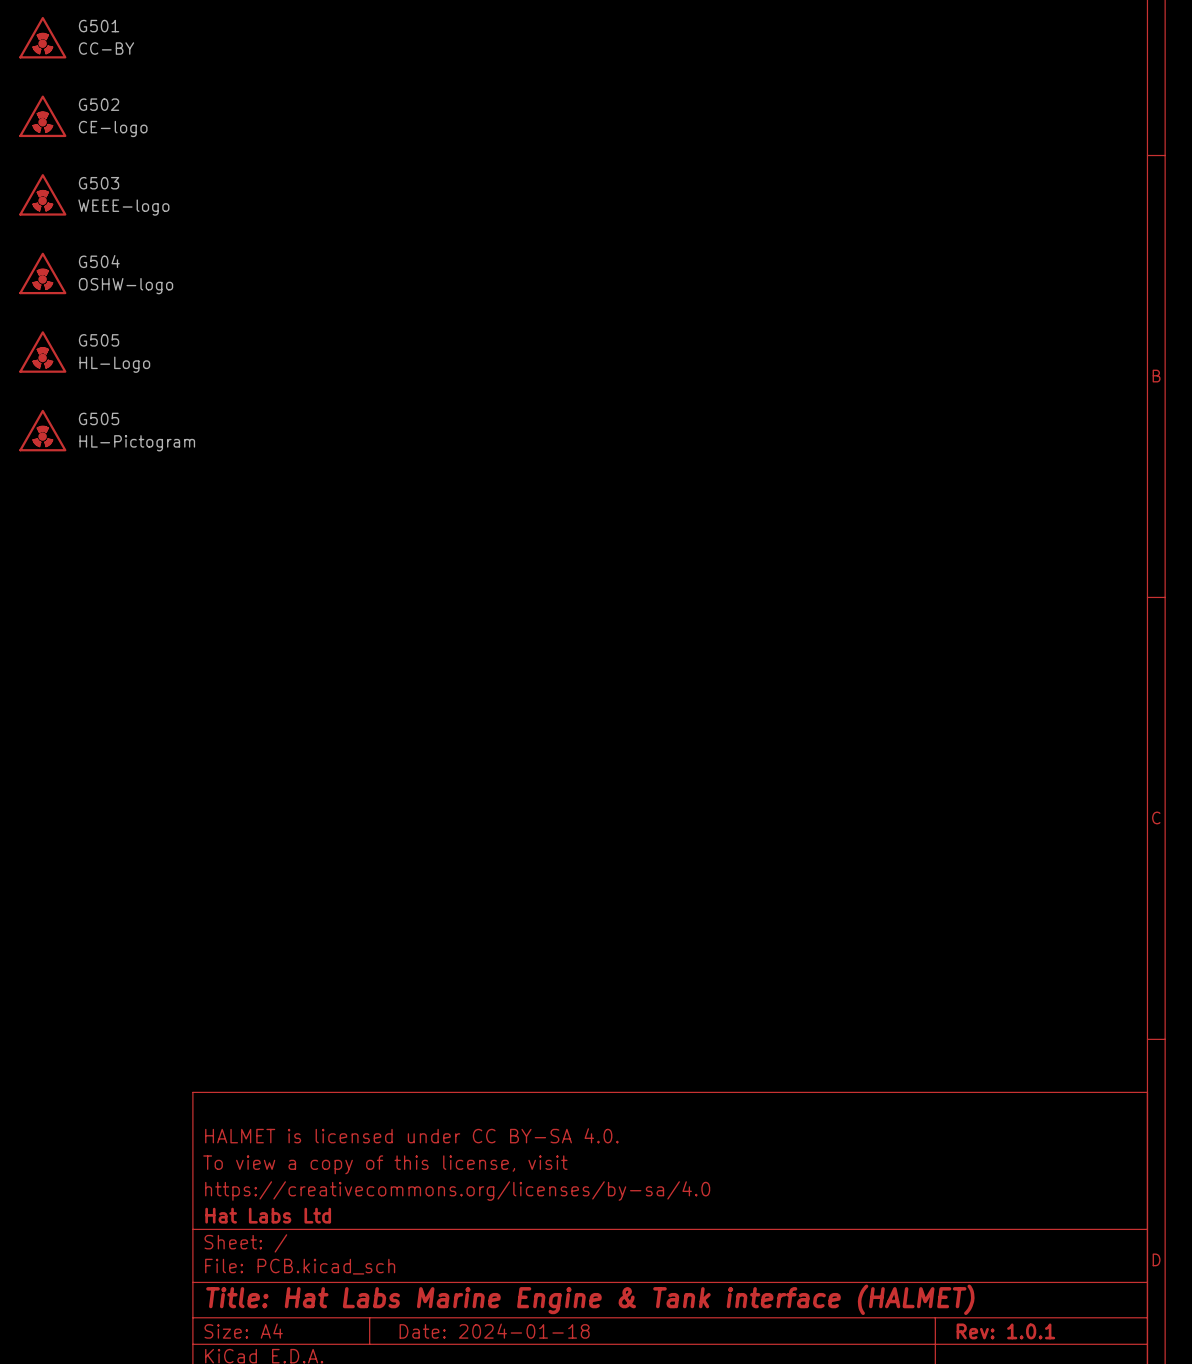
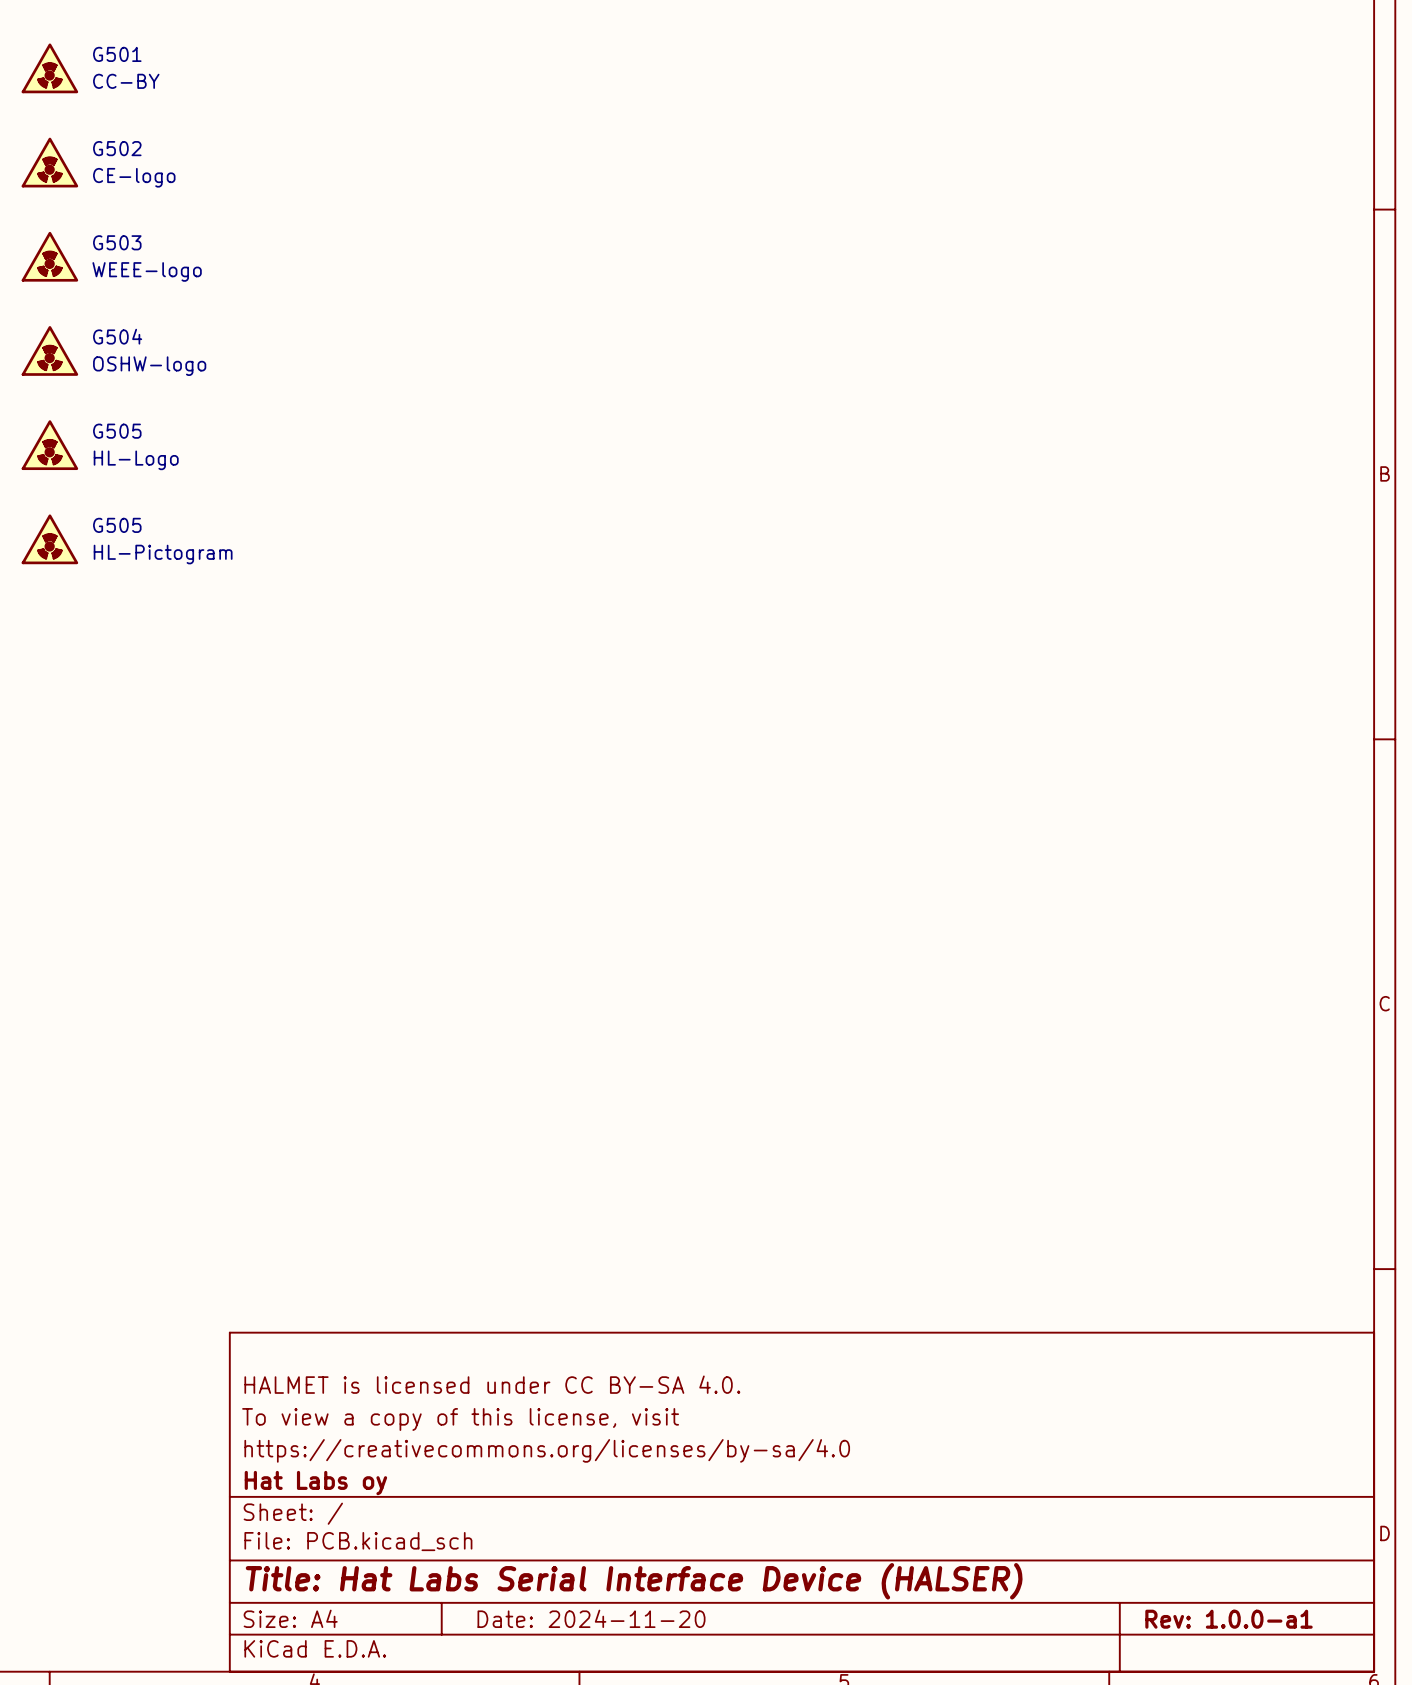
title block: Hat Labs Ltd (268, 1215) -> Hat Labs oy (315, 1483)
title block: Title: Hat Labs Marine Engine & Tank interface (HALMET) (590, 1299) -> Title: Hat Labs Serial Interface Device (HALSER) (634, 1581)
title block: Date: 2024-01-18 (494, 1331) -> Date: 2024-11-20 (591, 1618)
title block: Rev: 1.0.1 (1005, 1331) -> Rev: 1.0.0-a1 (1229, 1619)

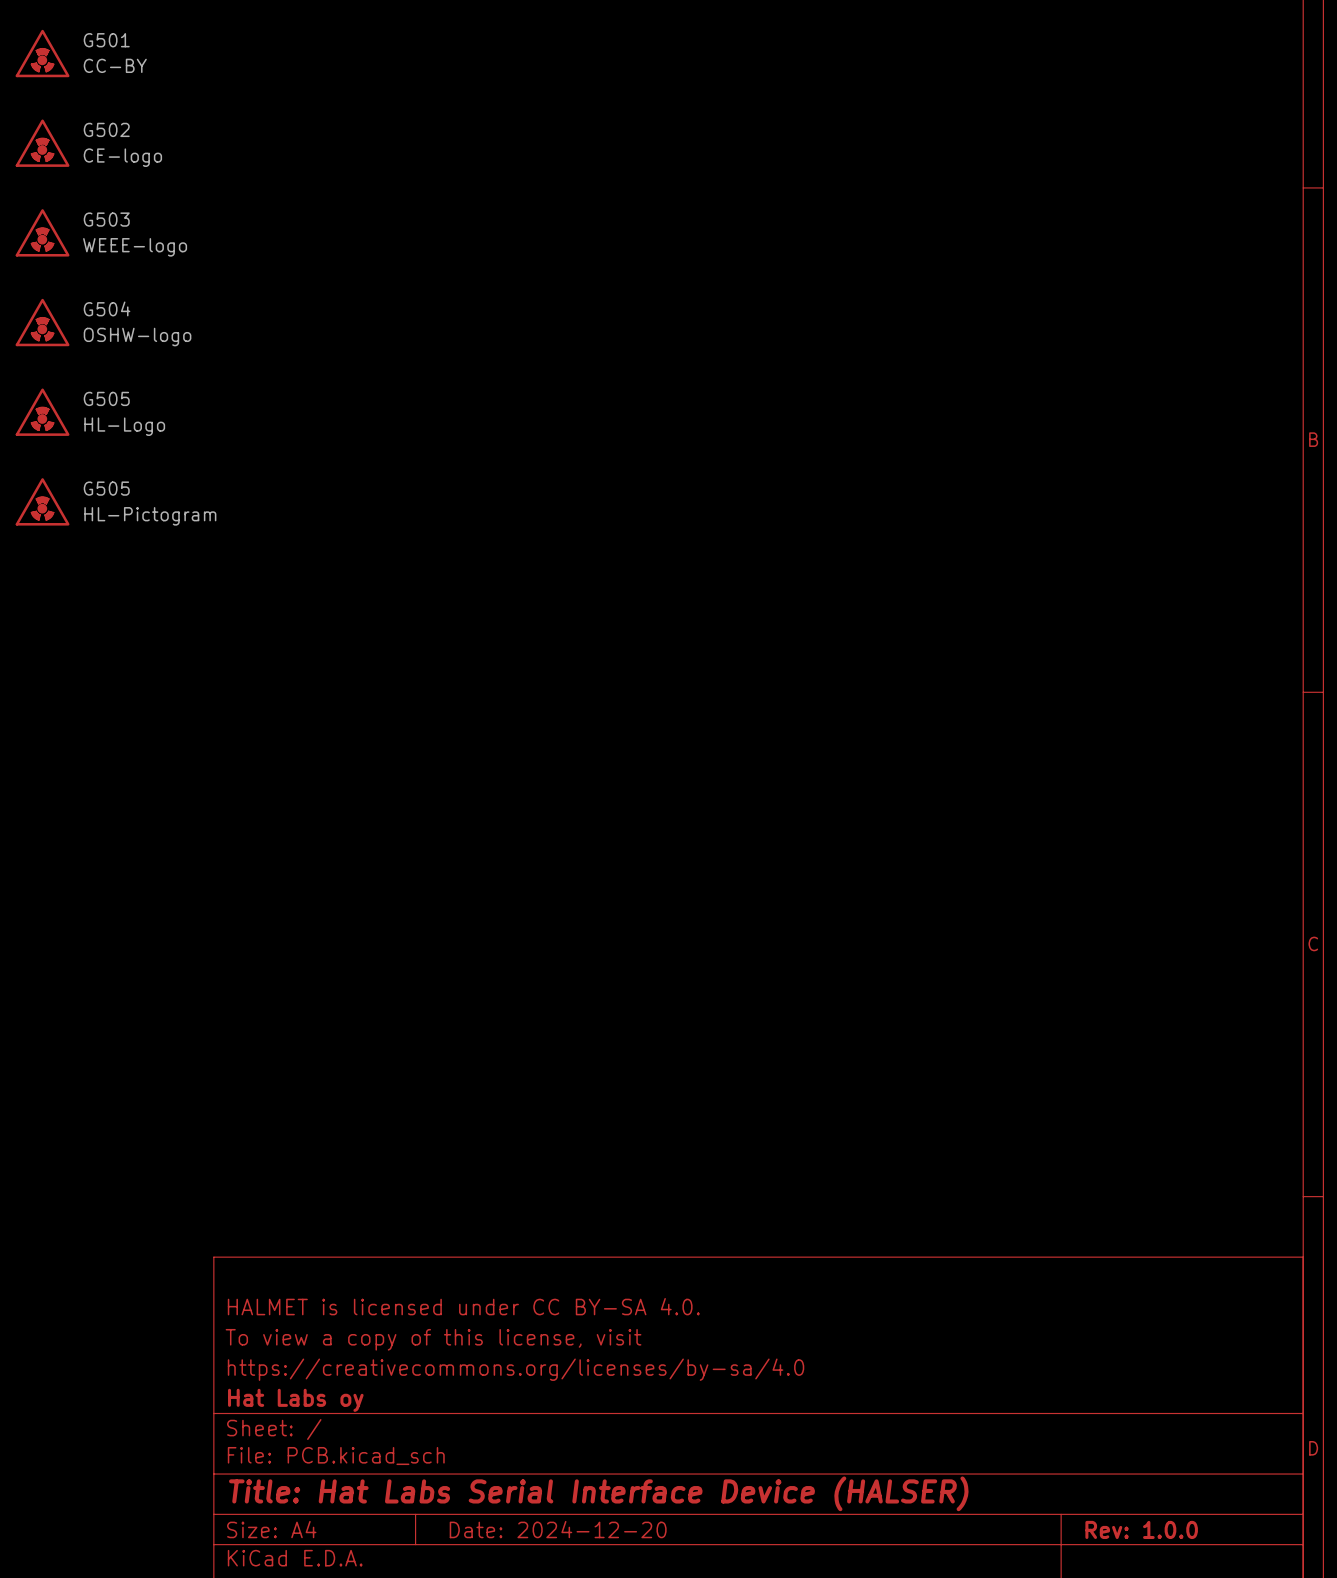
title block: Date: 2024-11-20 (591, 1618) -> Date: 2024-12-20 (558, 1529)
title block: Rev: 1.0.0-a1 (1229, 1619) -> Rev: 1.0.0 (1141, 1529)

